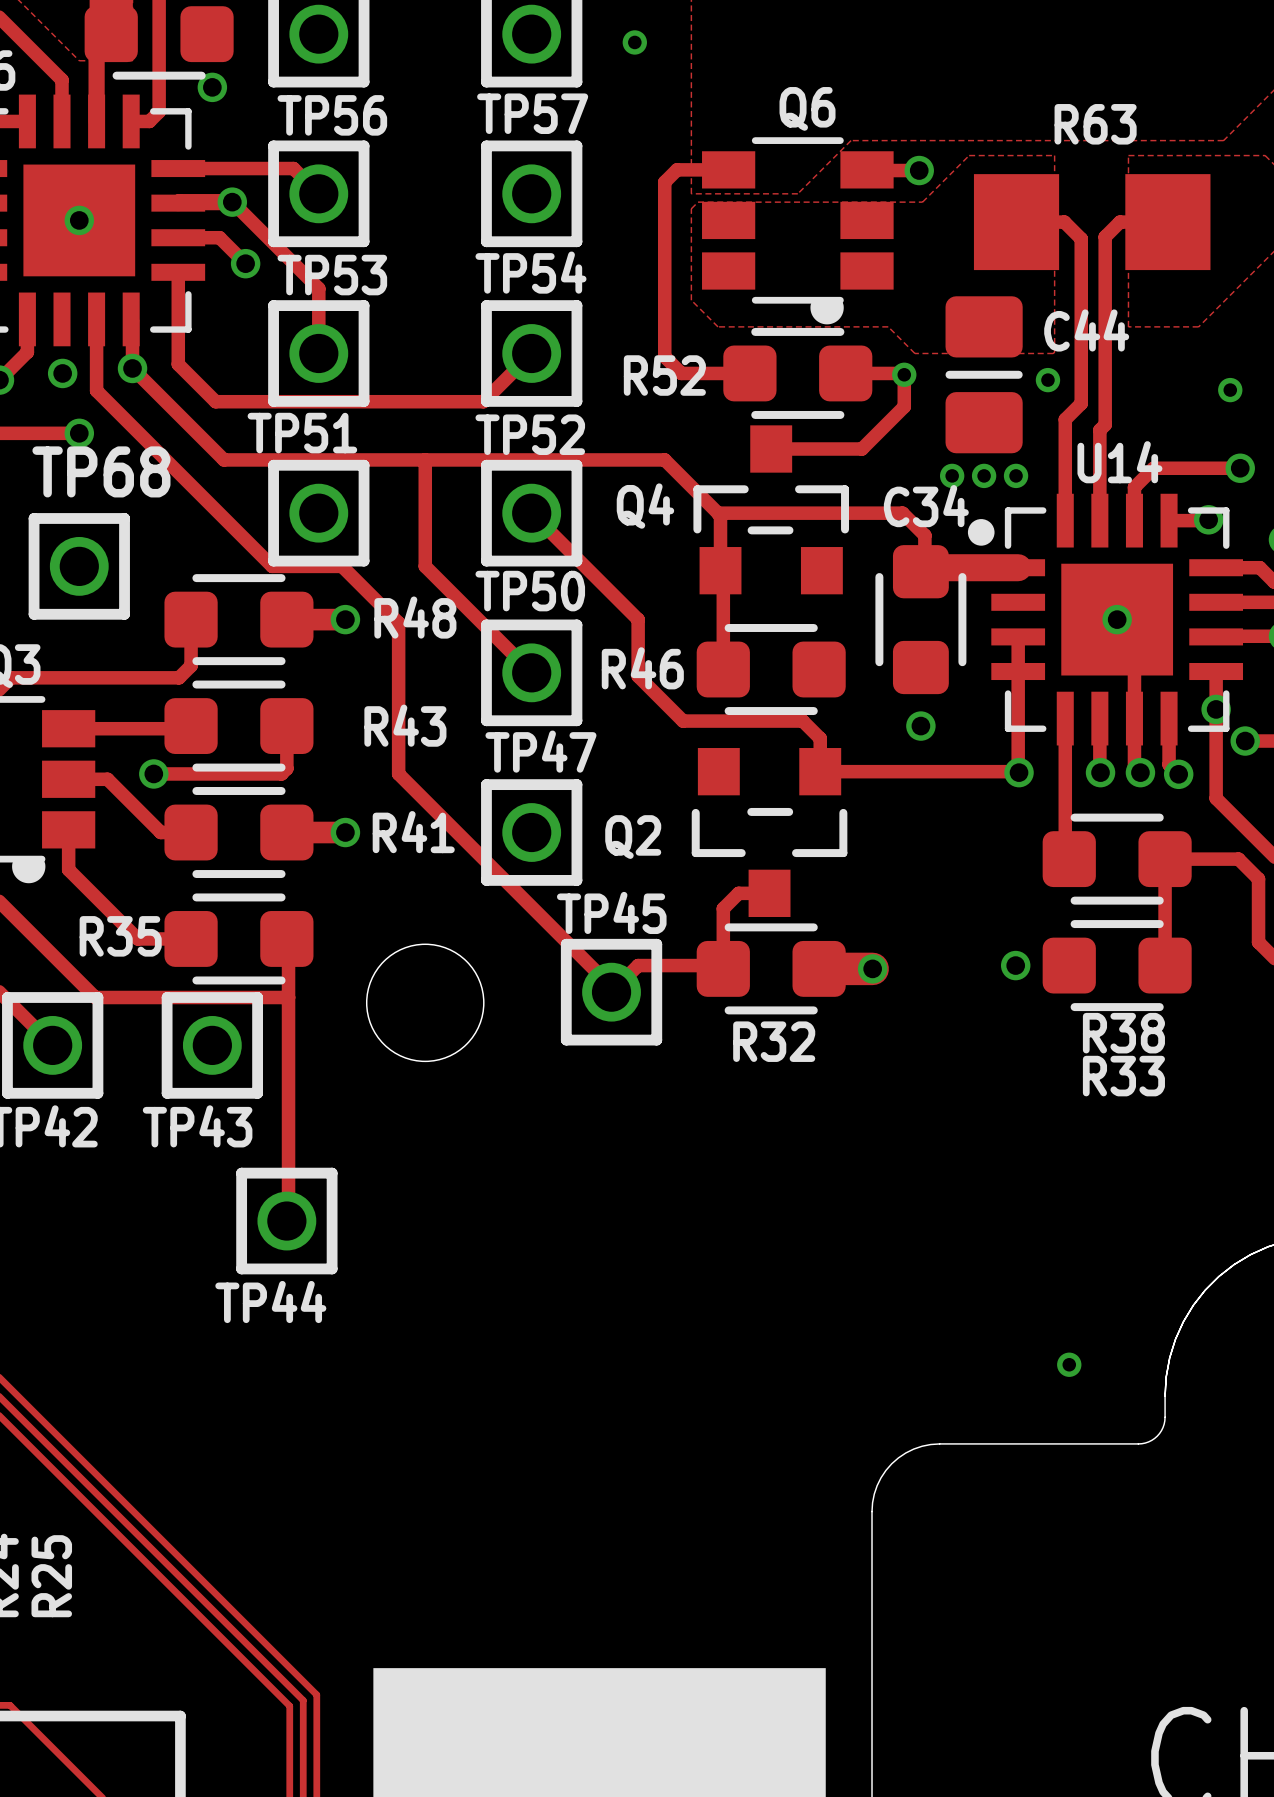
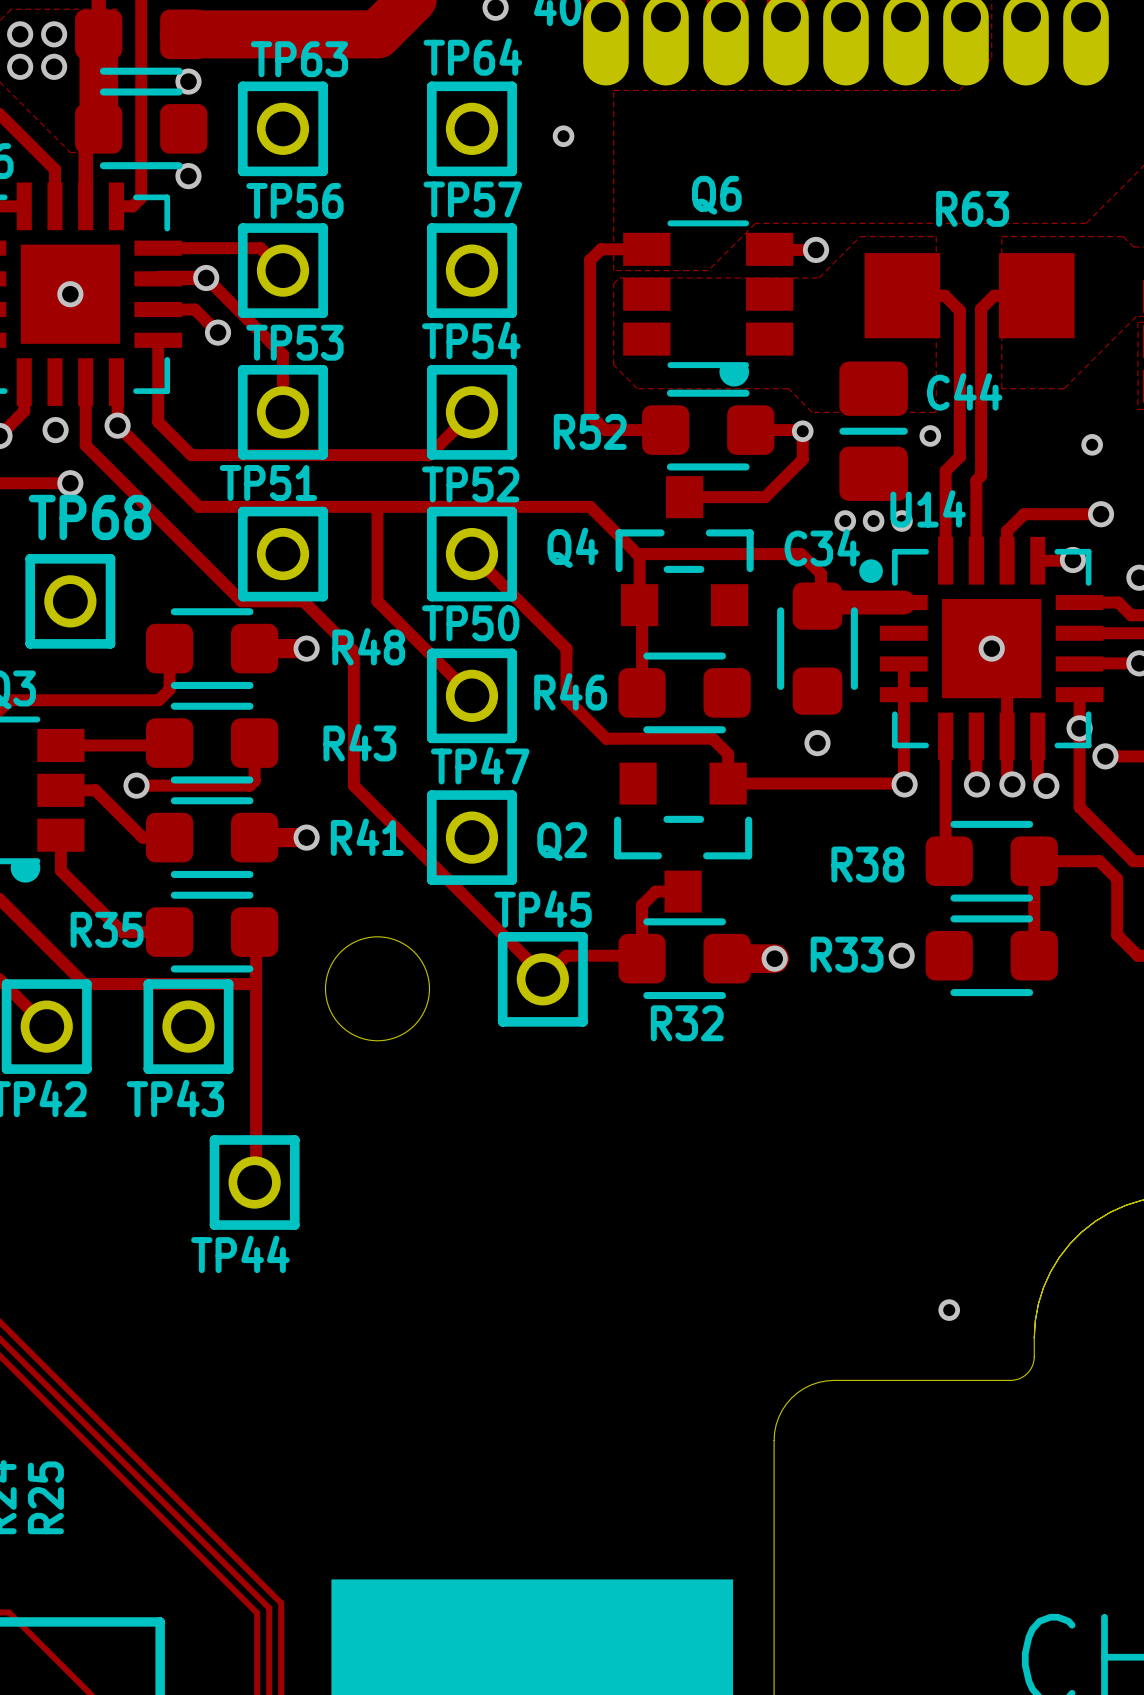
U14 name position: U14 (1119, 462) -> U14 (928, 508)
R38 name position: R38 (1123, 1033) -> R38 (867, 864)
R33 name position: R33 (1123, 1076) -> R33 (847, 954)

